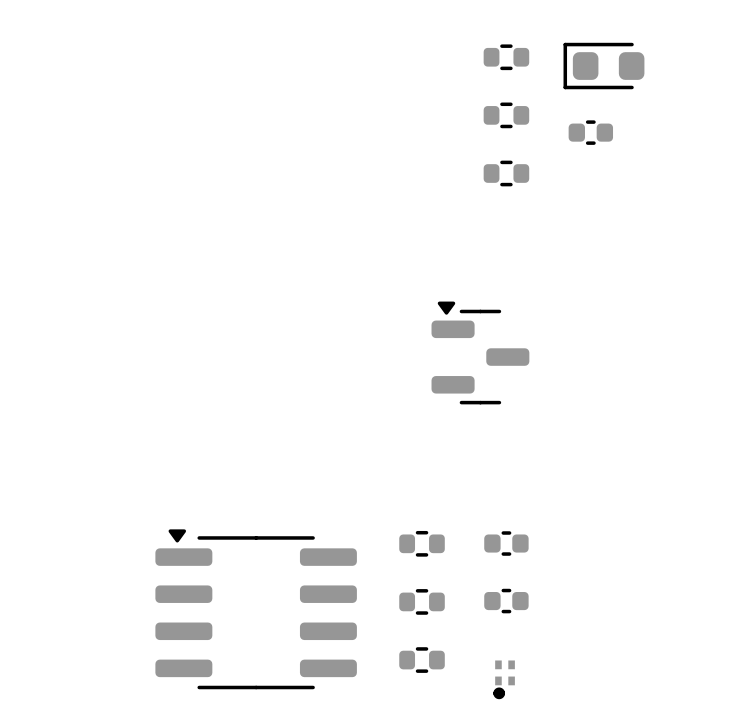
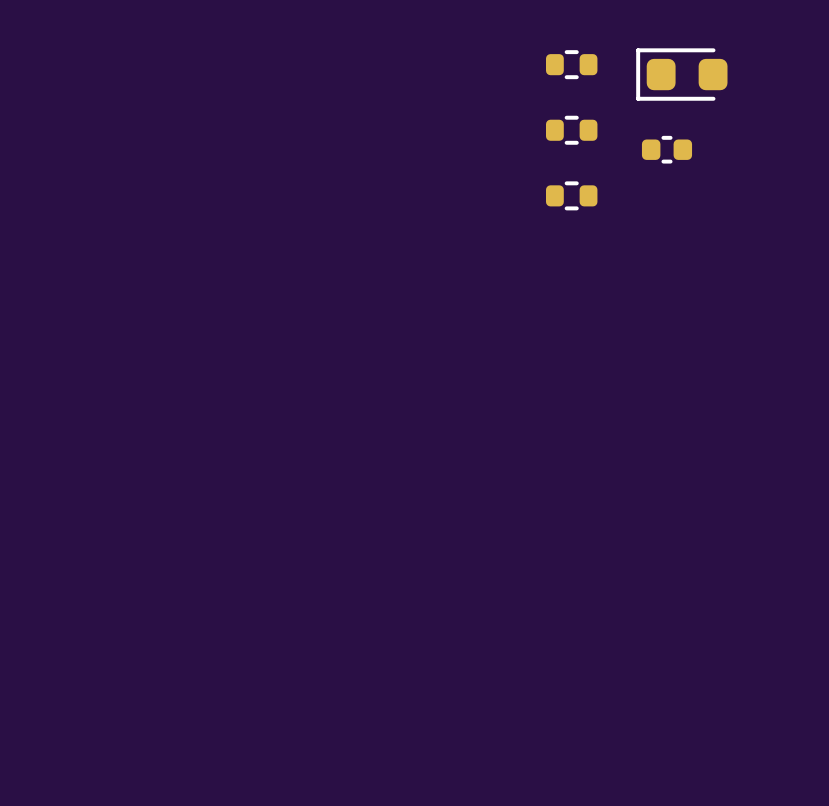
part: (480, 352) -> none
part: (422, 543) -> none
part: (506, 543) -> none
part: (422, 601) -> none
part: (506, 601) -> none
part: (256, 609) -> none
part: (422, 660) -> none
part: (504, 679) -> none

